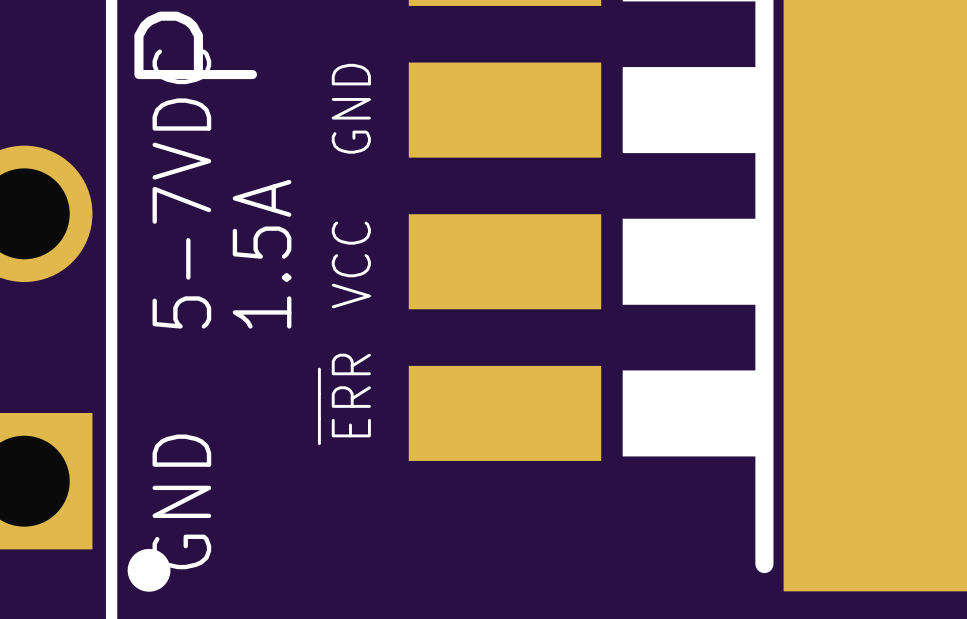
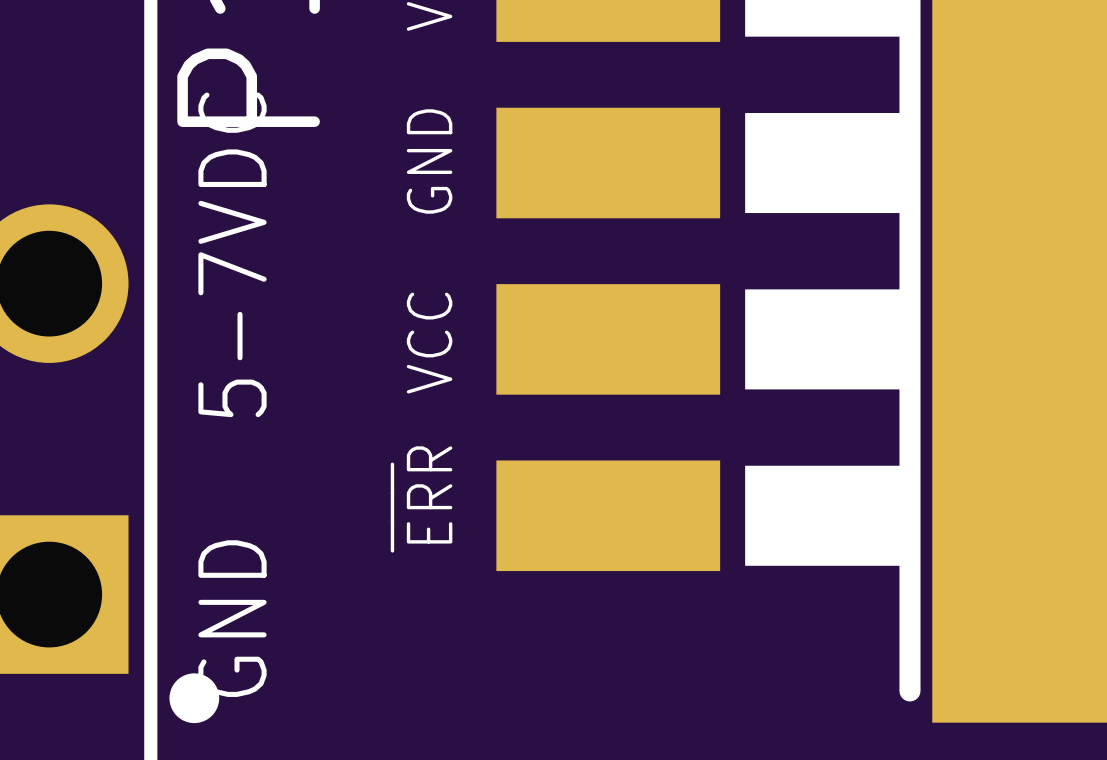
text: 1.5A (262, 254) -> none

